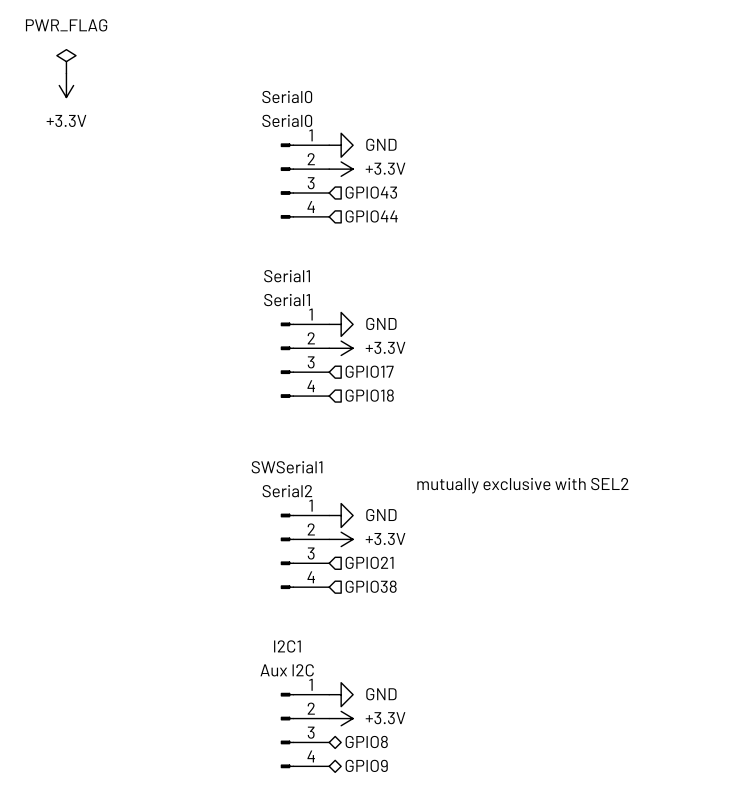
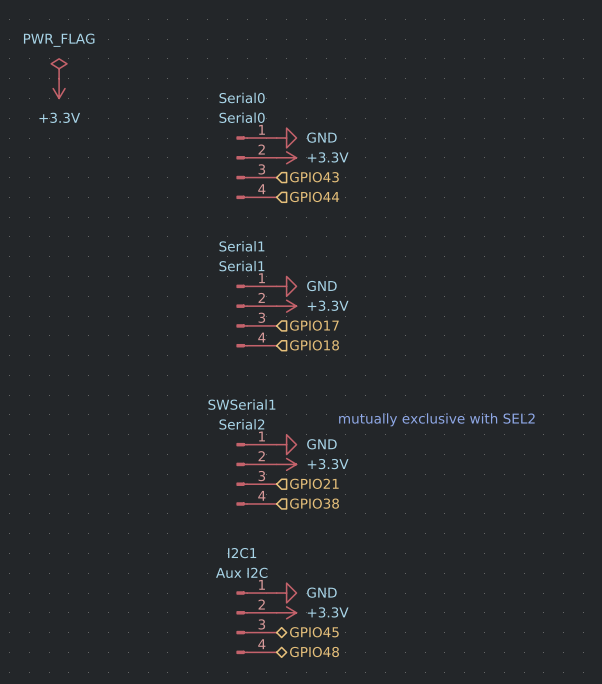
hierarchical label: GPIO8 (366, 741) -> GPIO45 (314, 632)
hierarchical label: GPIO9 (366, 765) -> GPIO48 (314, 652)

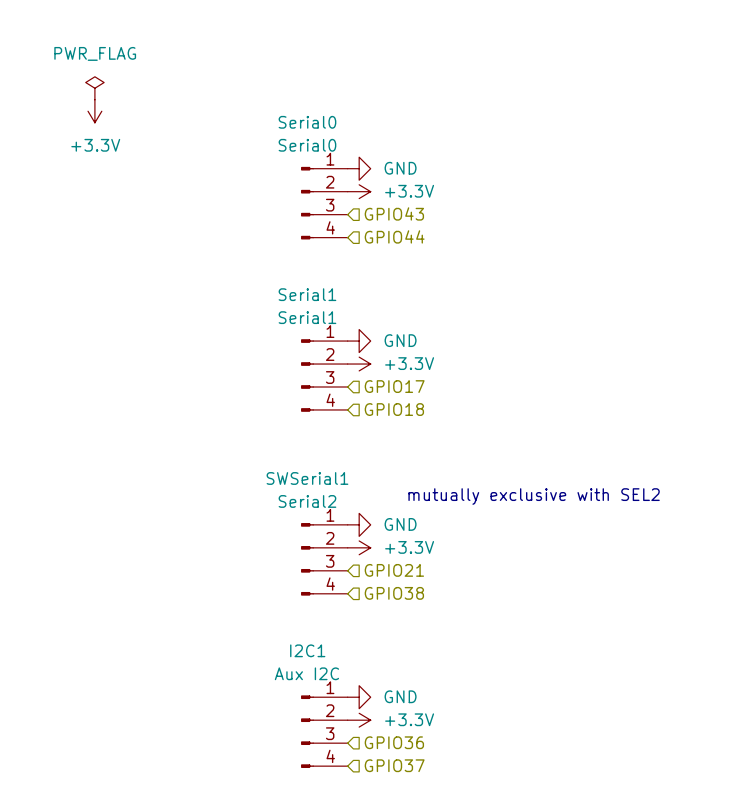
hierarchical label shape: bidirectional (314, 632) -> input (394, 742)
hierarchical label: GPIO45 (314, 632) -> GPIO36 (394, 742)
hierarchical label shape: bidirectional (314, 652) -> input (394, 765)
hierarchical label: GPIO48 (314, 652) -> GPIO37 (394, 765)

